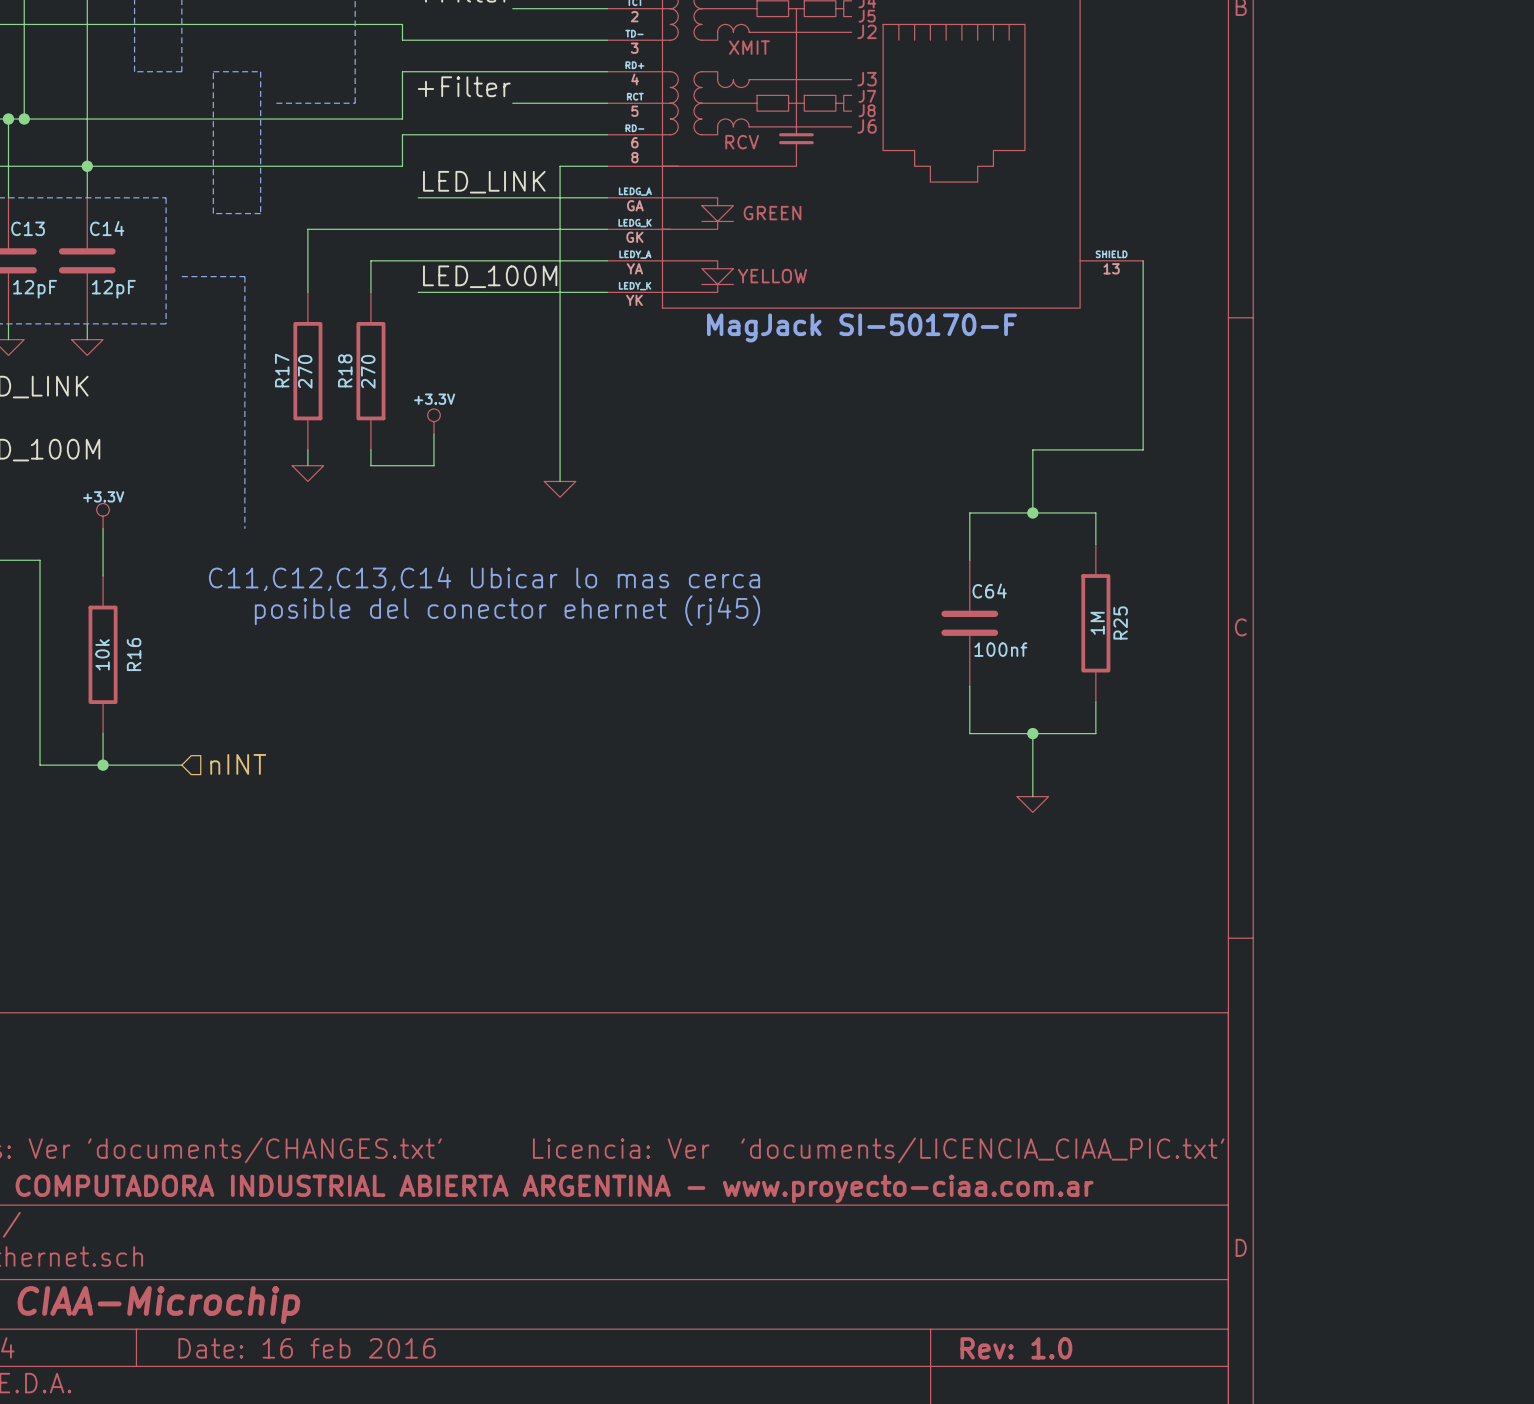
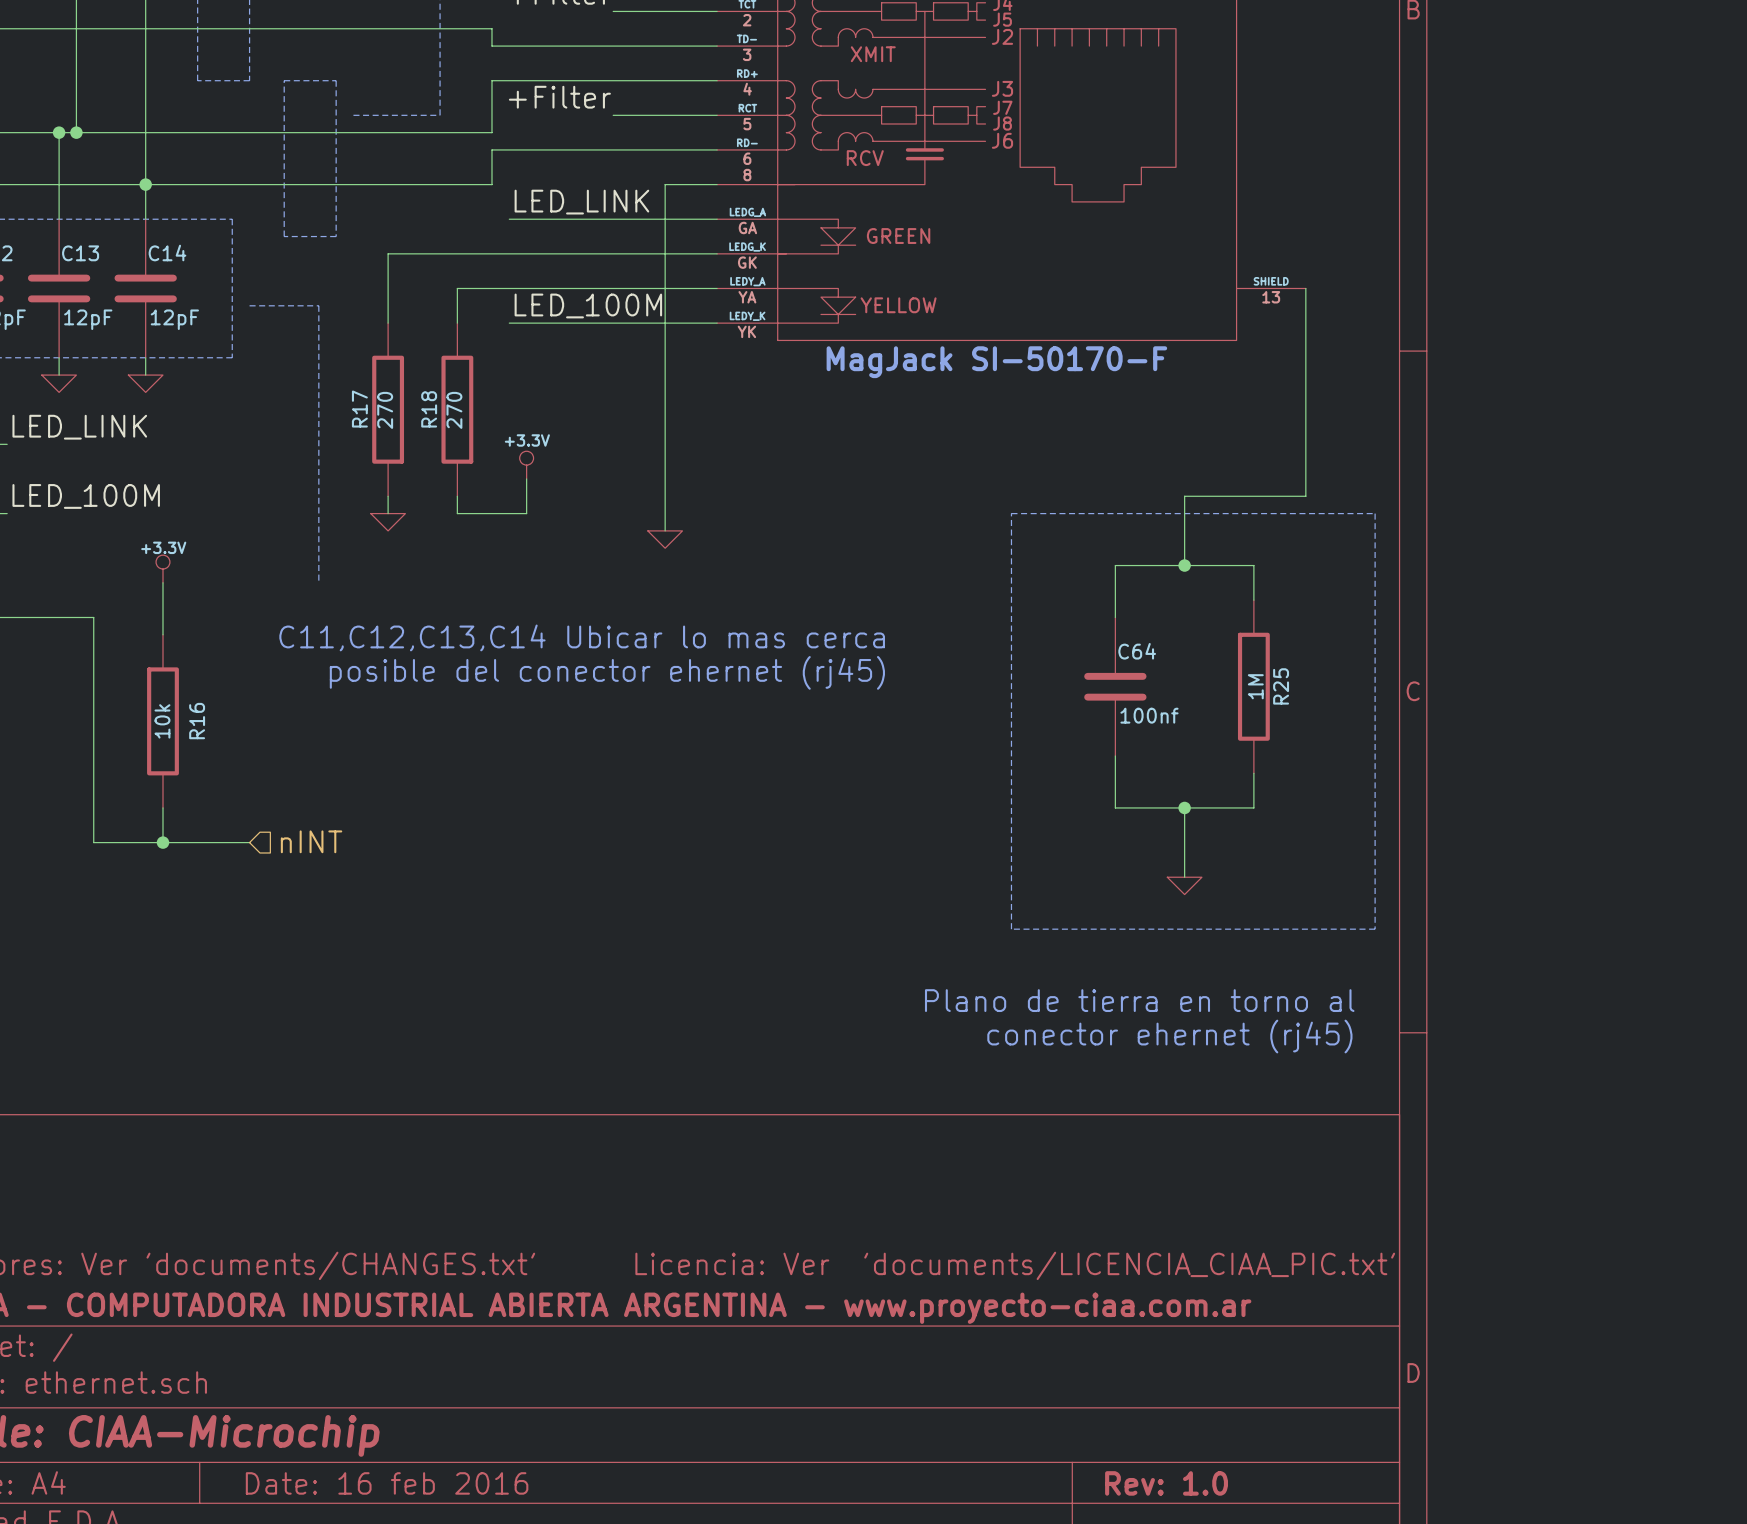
line: none -> (1011, 513) (1375, 513) (1375, 929) (1011, 929) (1011, 513)
text: none -> Plano de tierra en torno al (1139, 1000)
text: none -> conector ehernet (rj45) (1169, 1036)

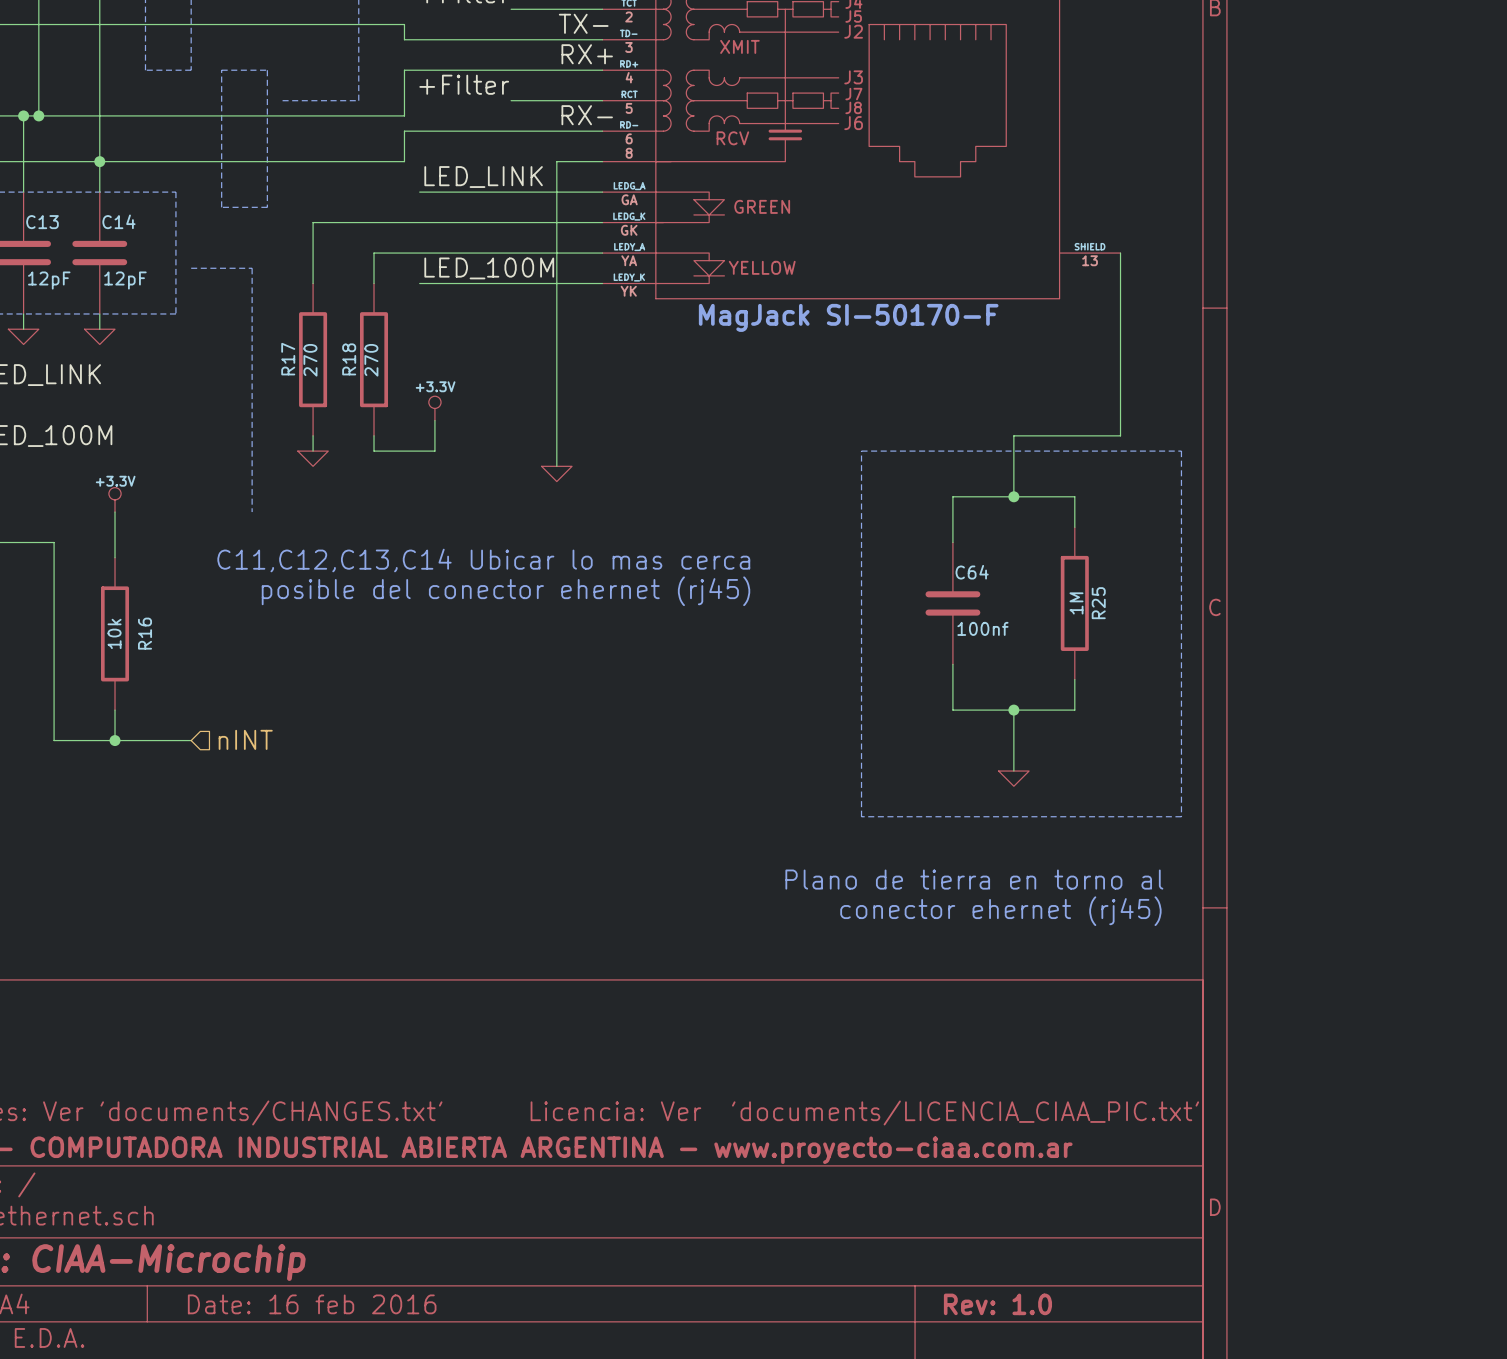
label: none -> TX- (583, 23)
label: none -> RX+ (587, 54)
label: none -> RX- (587, 115)

